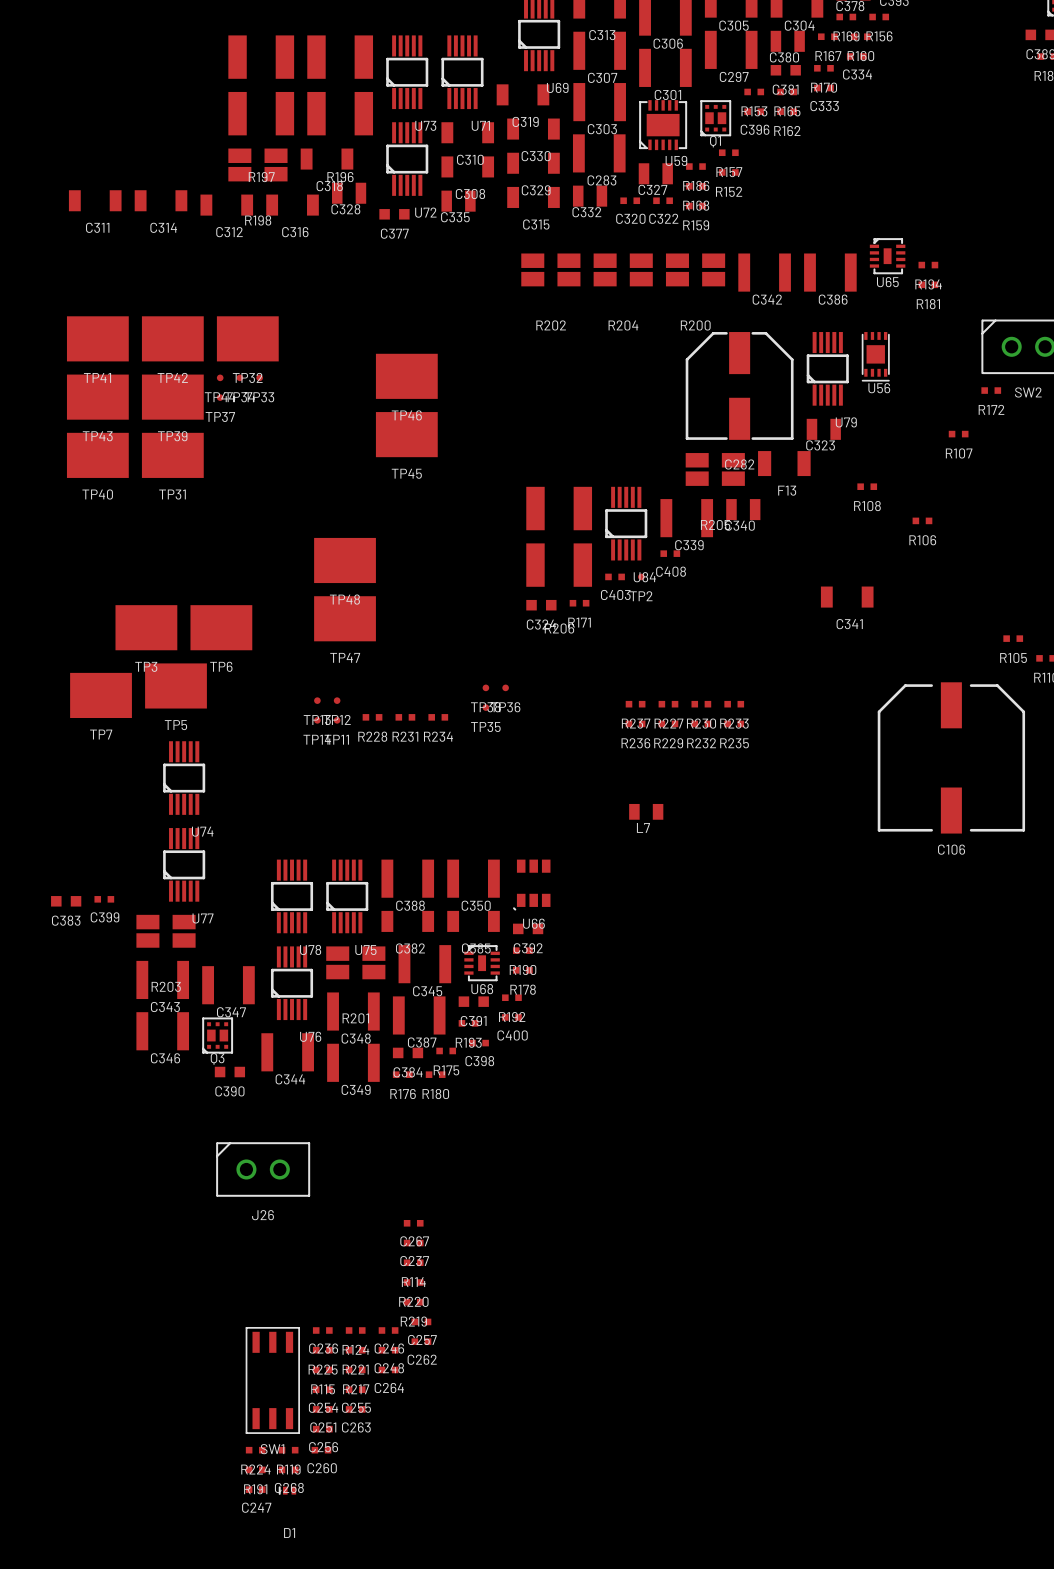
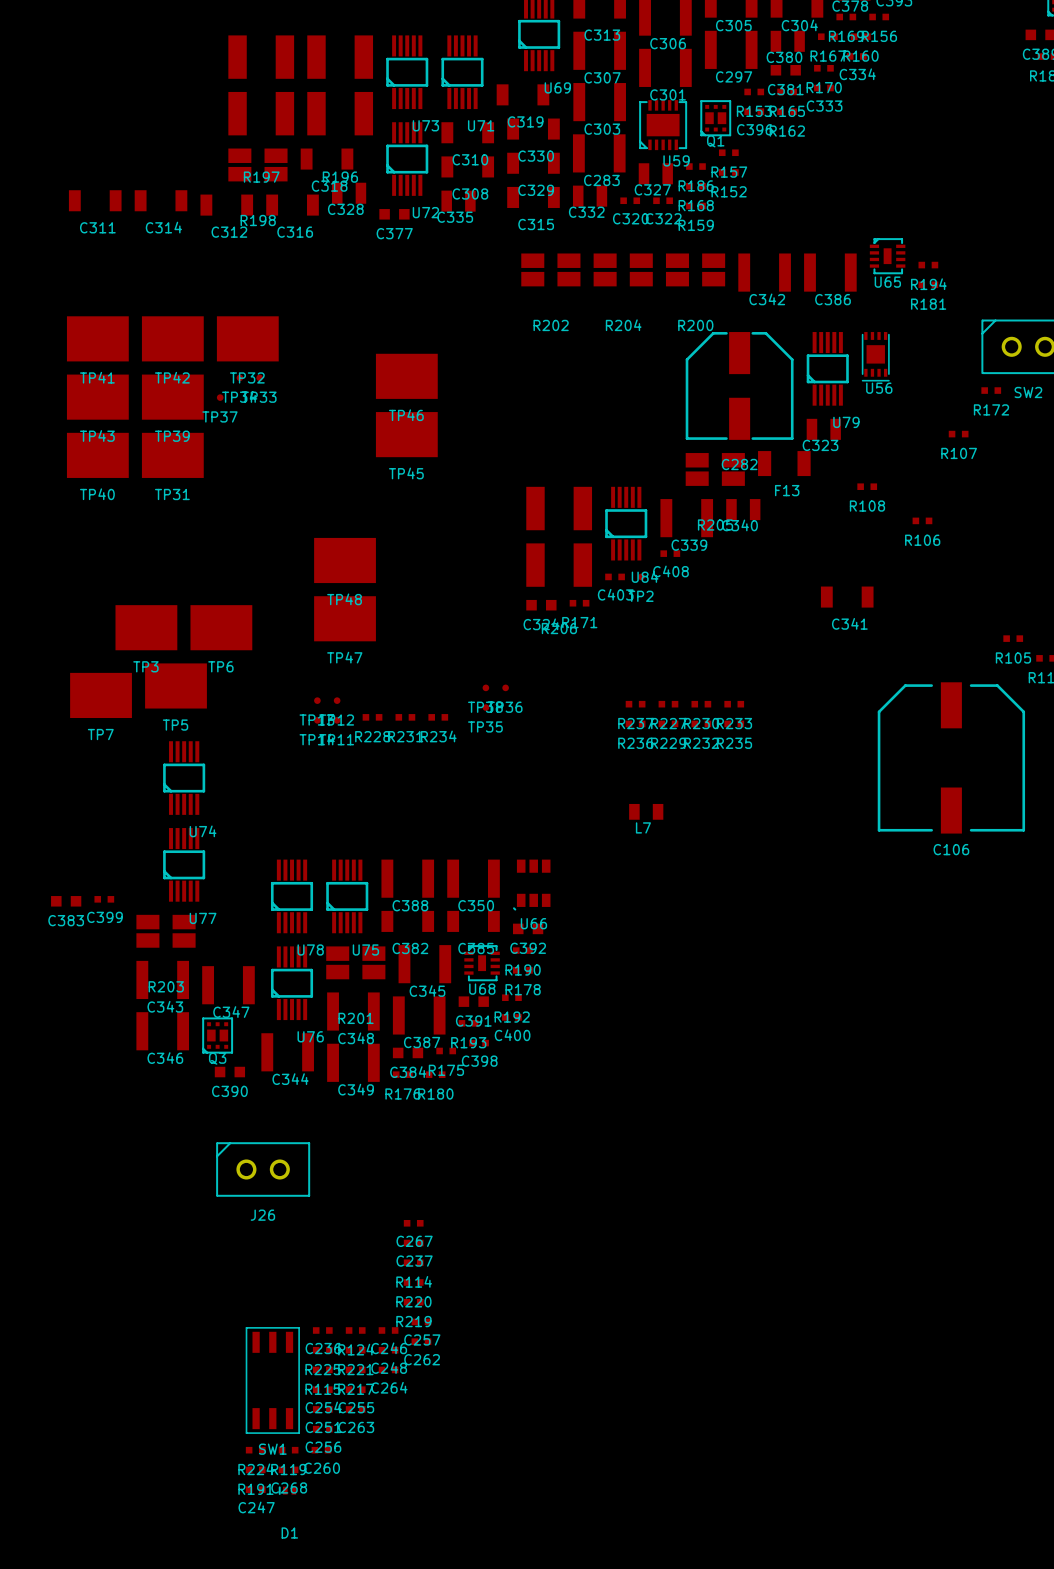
TP44: (220, 377) -> none

